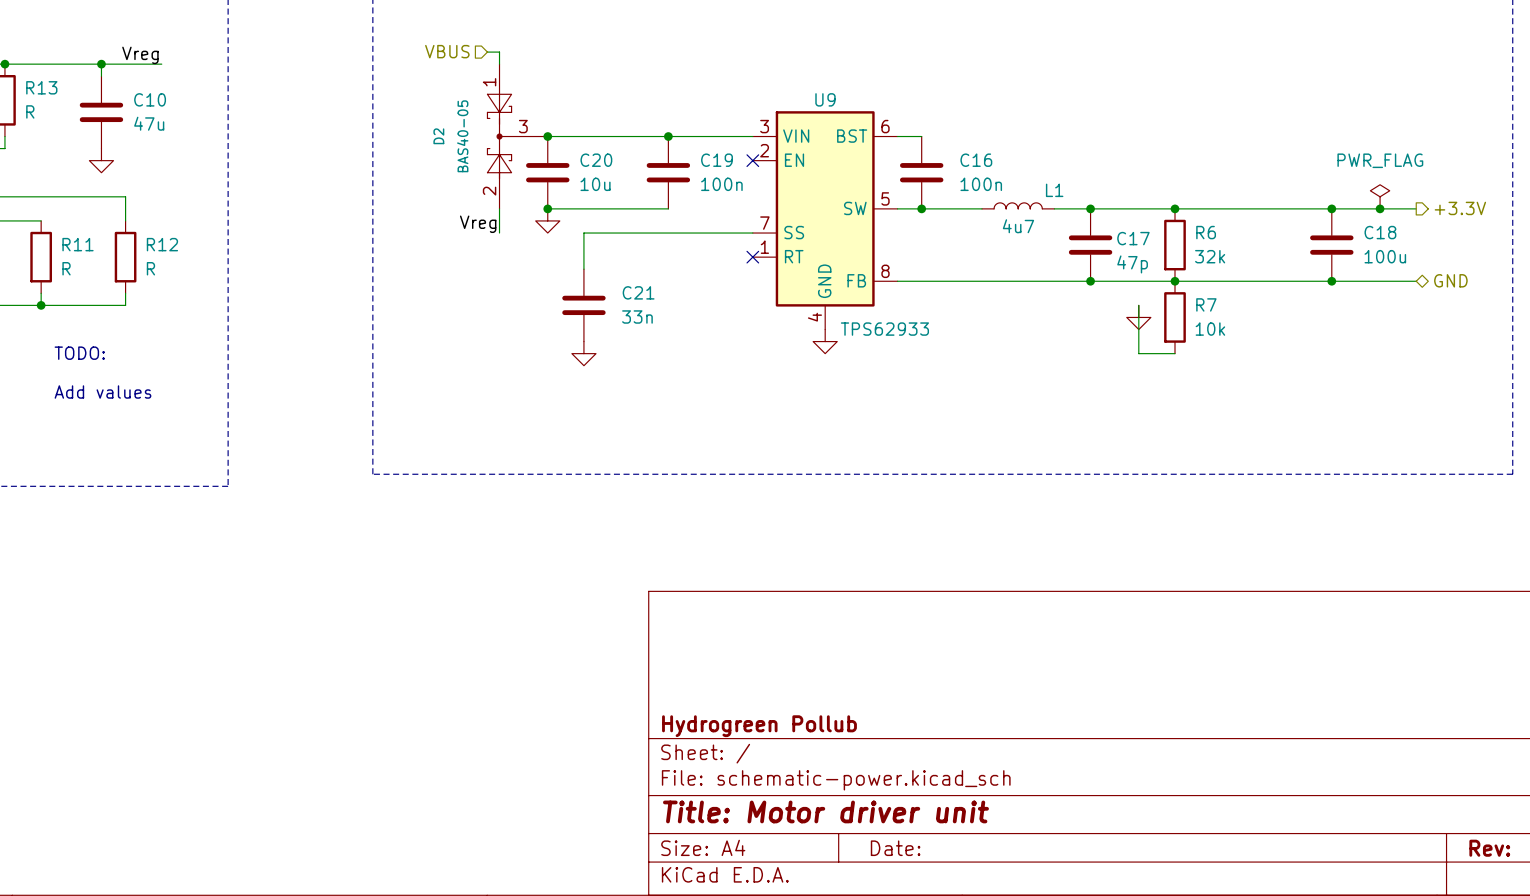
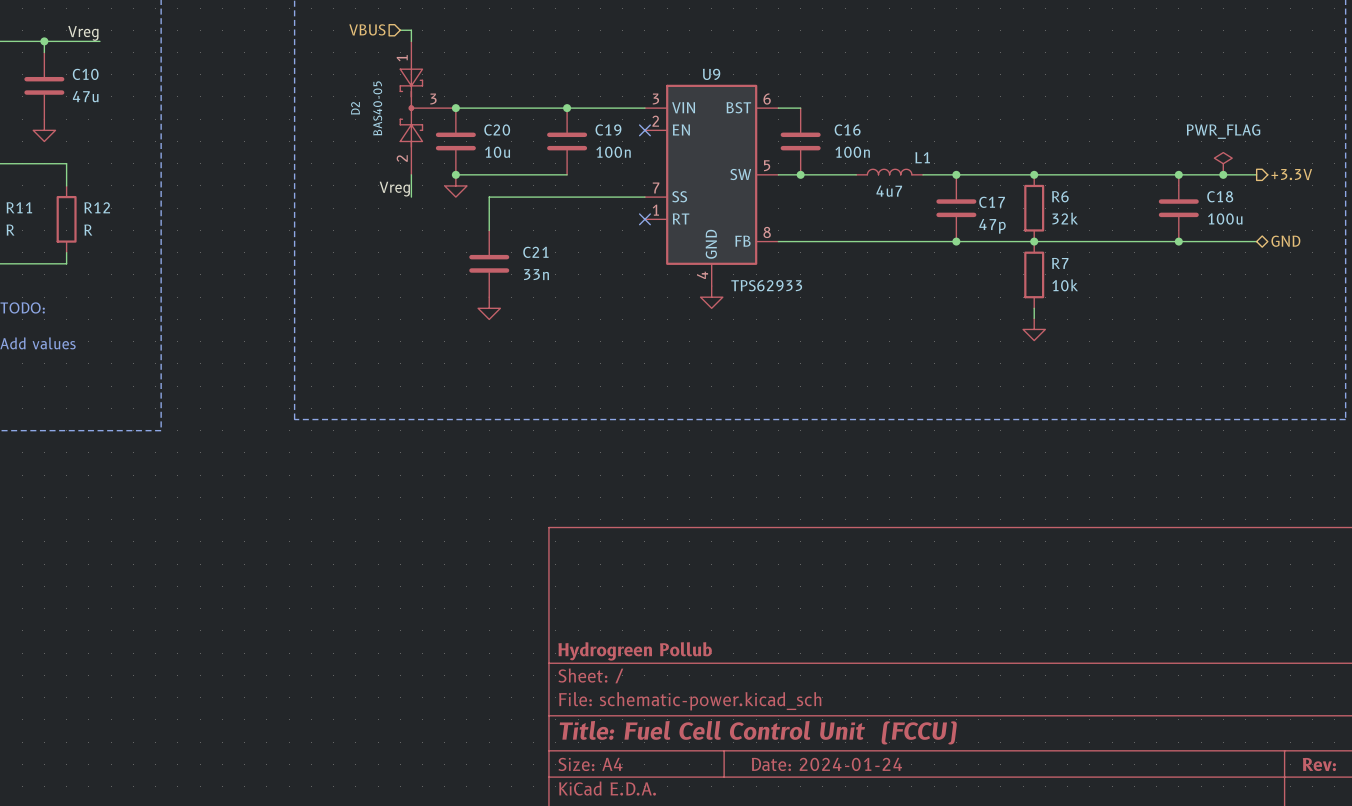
wire: (1138, 305) (1138, 353) (1175, 353) -> (1034, 318) (1034, 308)
power symbol position: (1138, 317) -> (1034, 329)
title block: Title: Motor driver unit (825, 811) -> Title: Fuel Cell Control Unit (FCCU) (758, 732)
title block: Date: (895, 848) -> Date: 2024-01-24 (826, 764)

